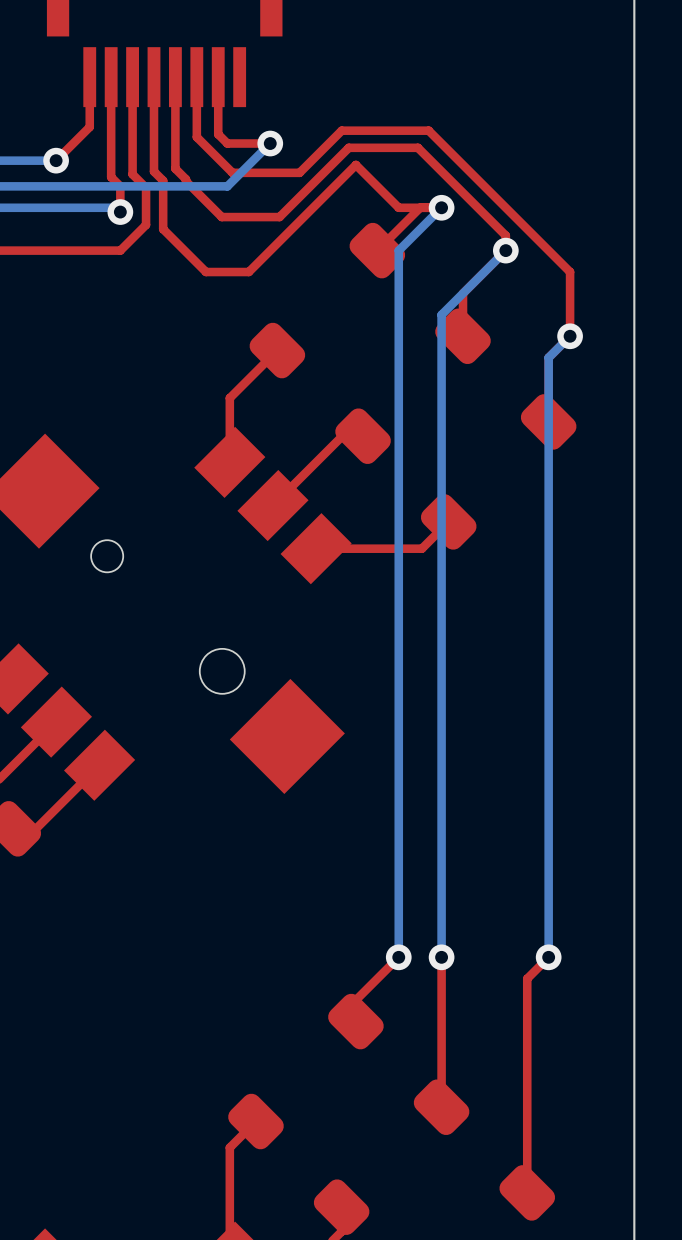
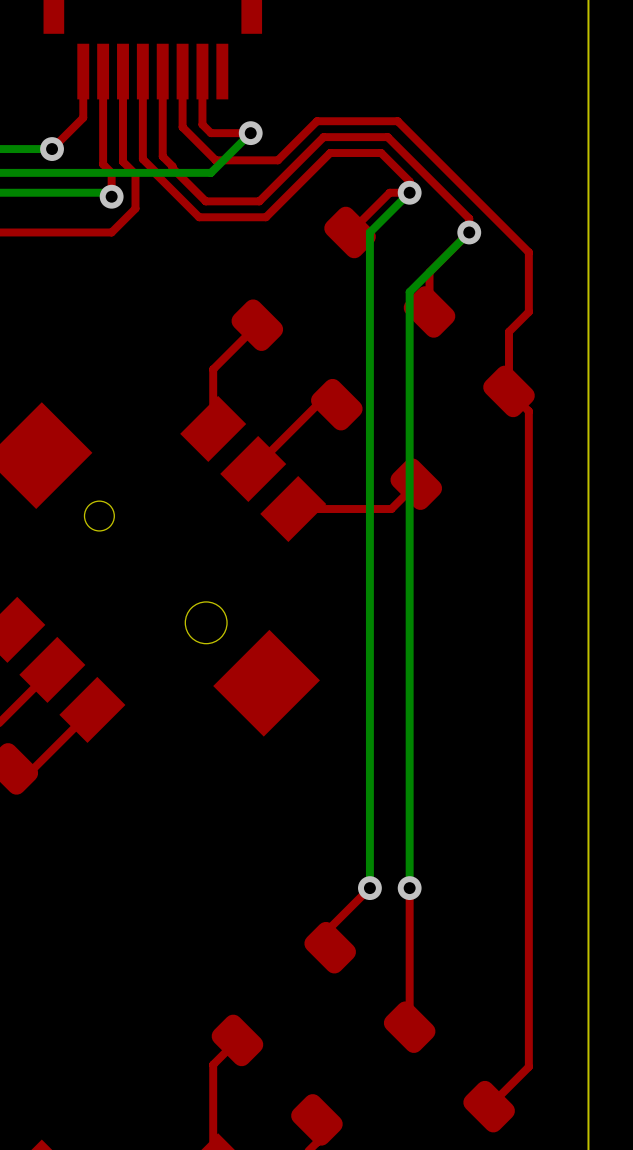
top track: (355, 164) (398, 207) (420, 207) -> (330, 153) (381, 153) (409, 181) (409, 192)
top track: (163, 180) (163, 229) (206, 272) (248, 272) (286, 234) -> (151, 167) (199, 217) (265, 217)
bottom track: (570, 336) (548, 357) (548, 957) -> none
via: (570, 336) -> none
top track: (548, 957) (527, 978) (527, 1192) -> (508, 391) (528, 411) (528, 1066) (489, 1106)
via: (548, 957) -> none

